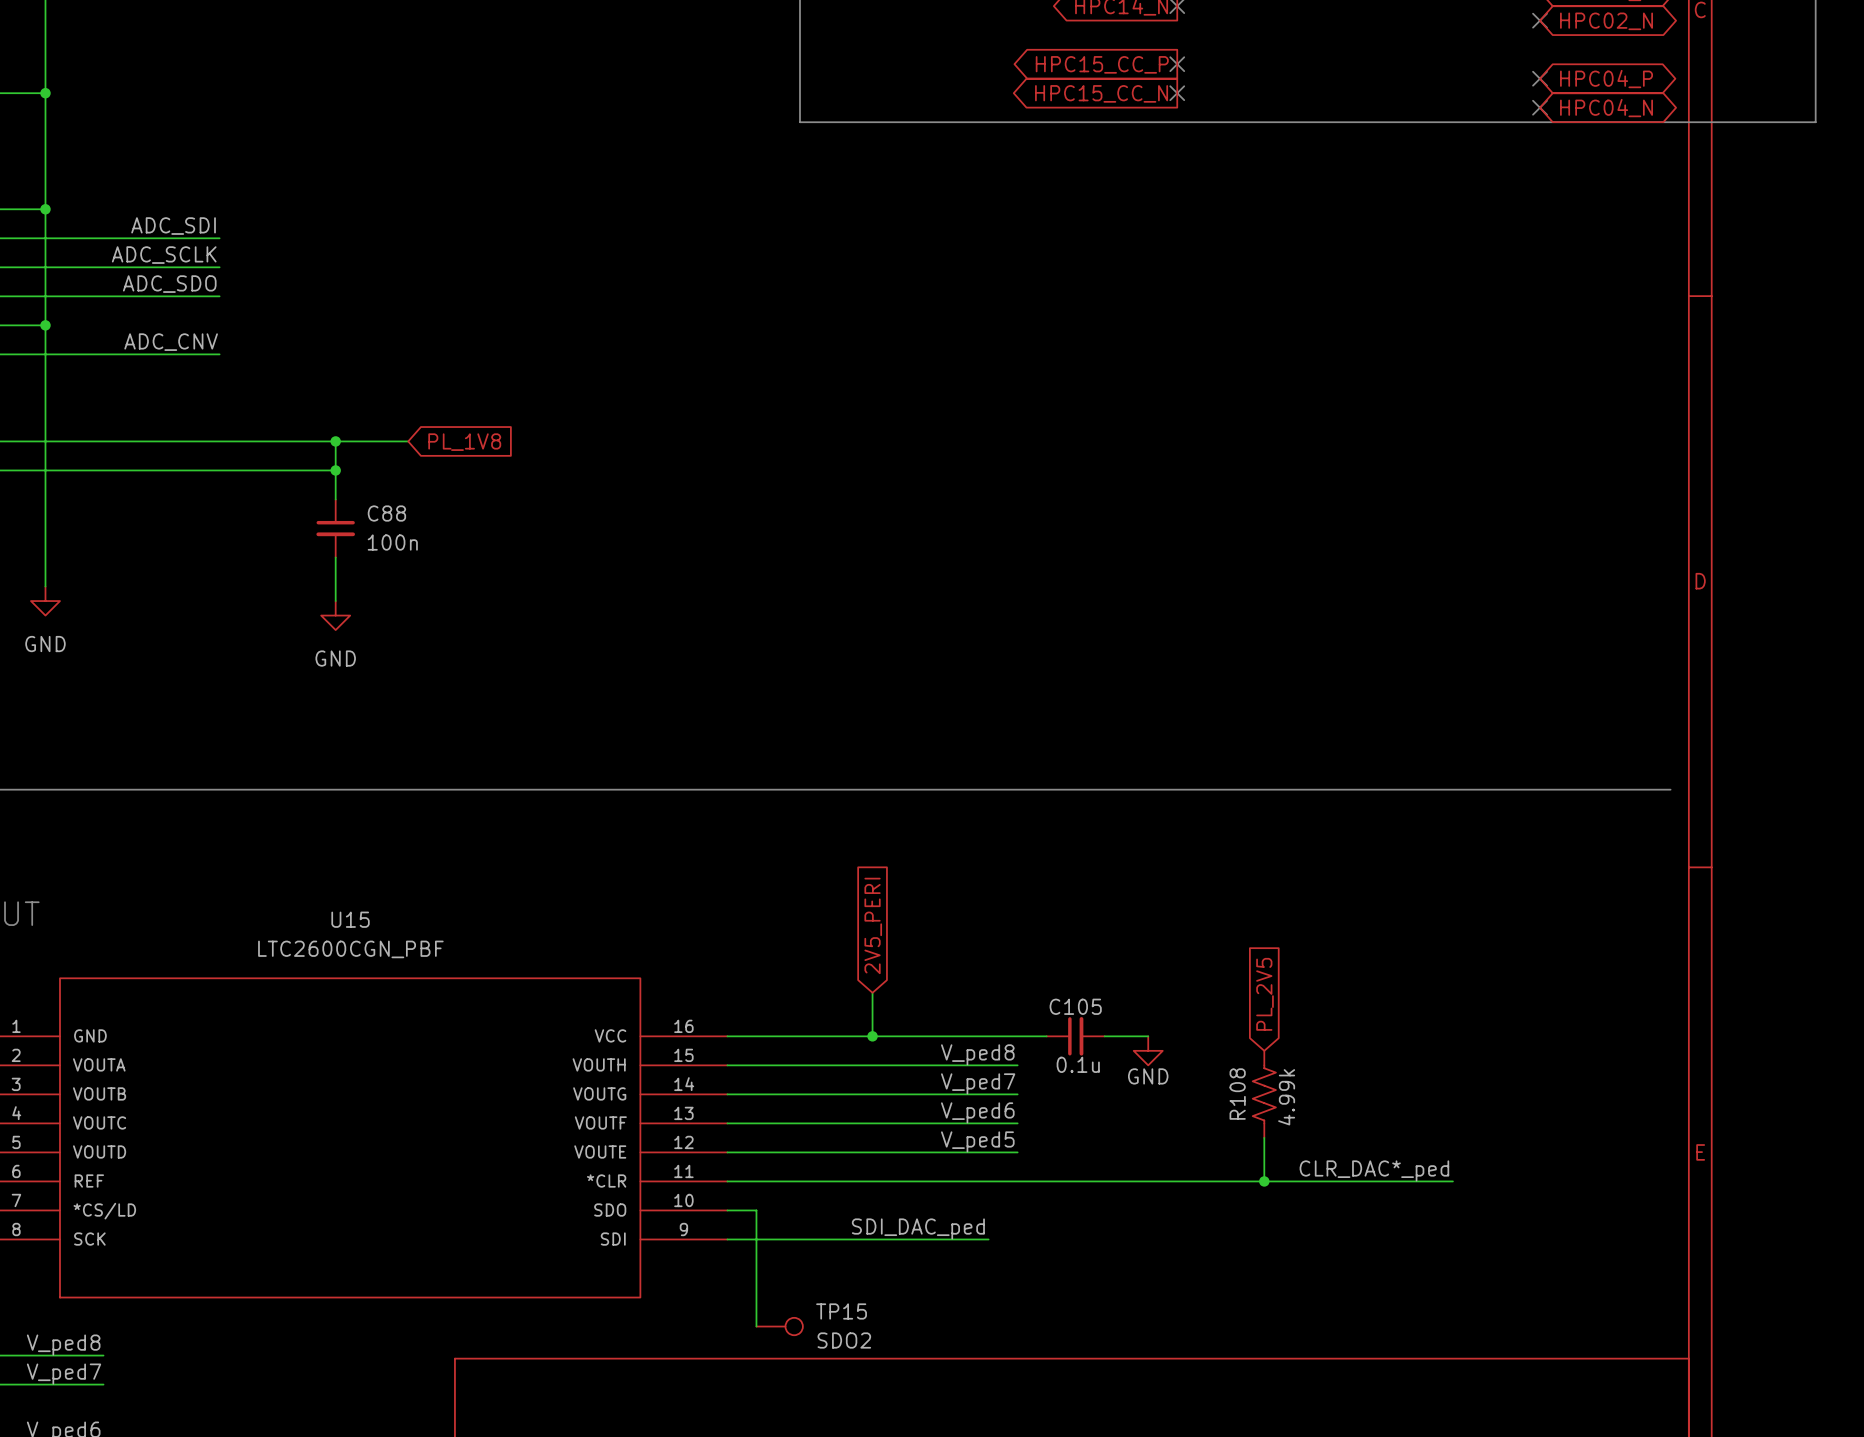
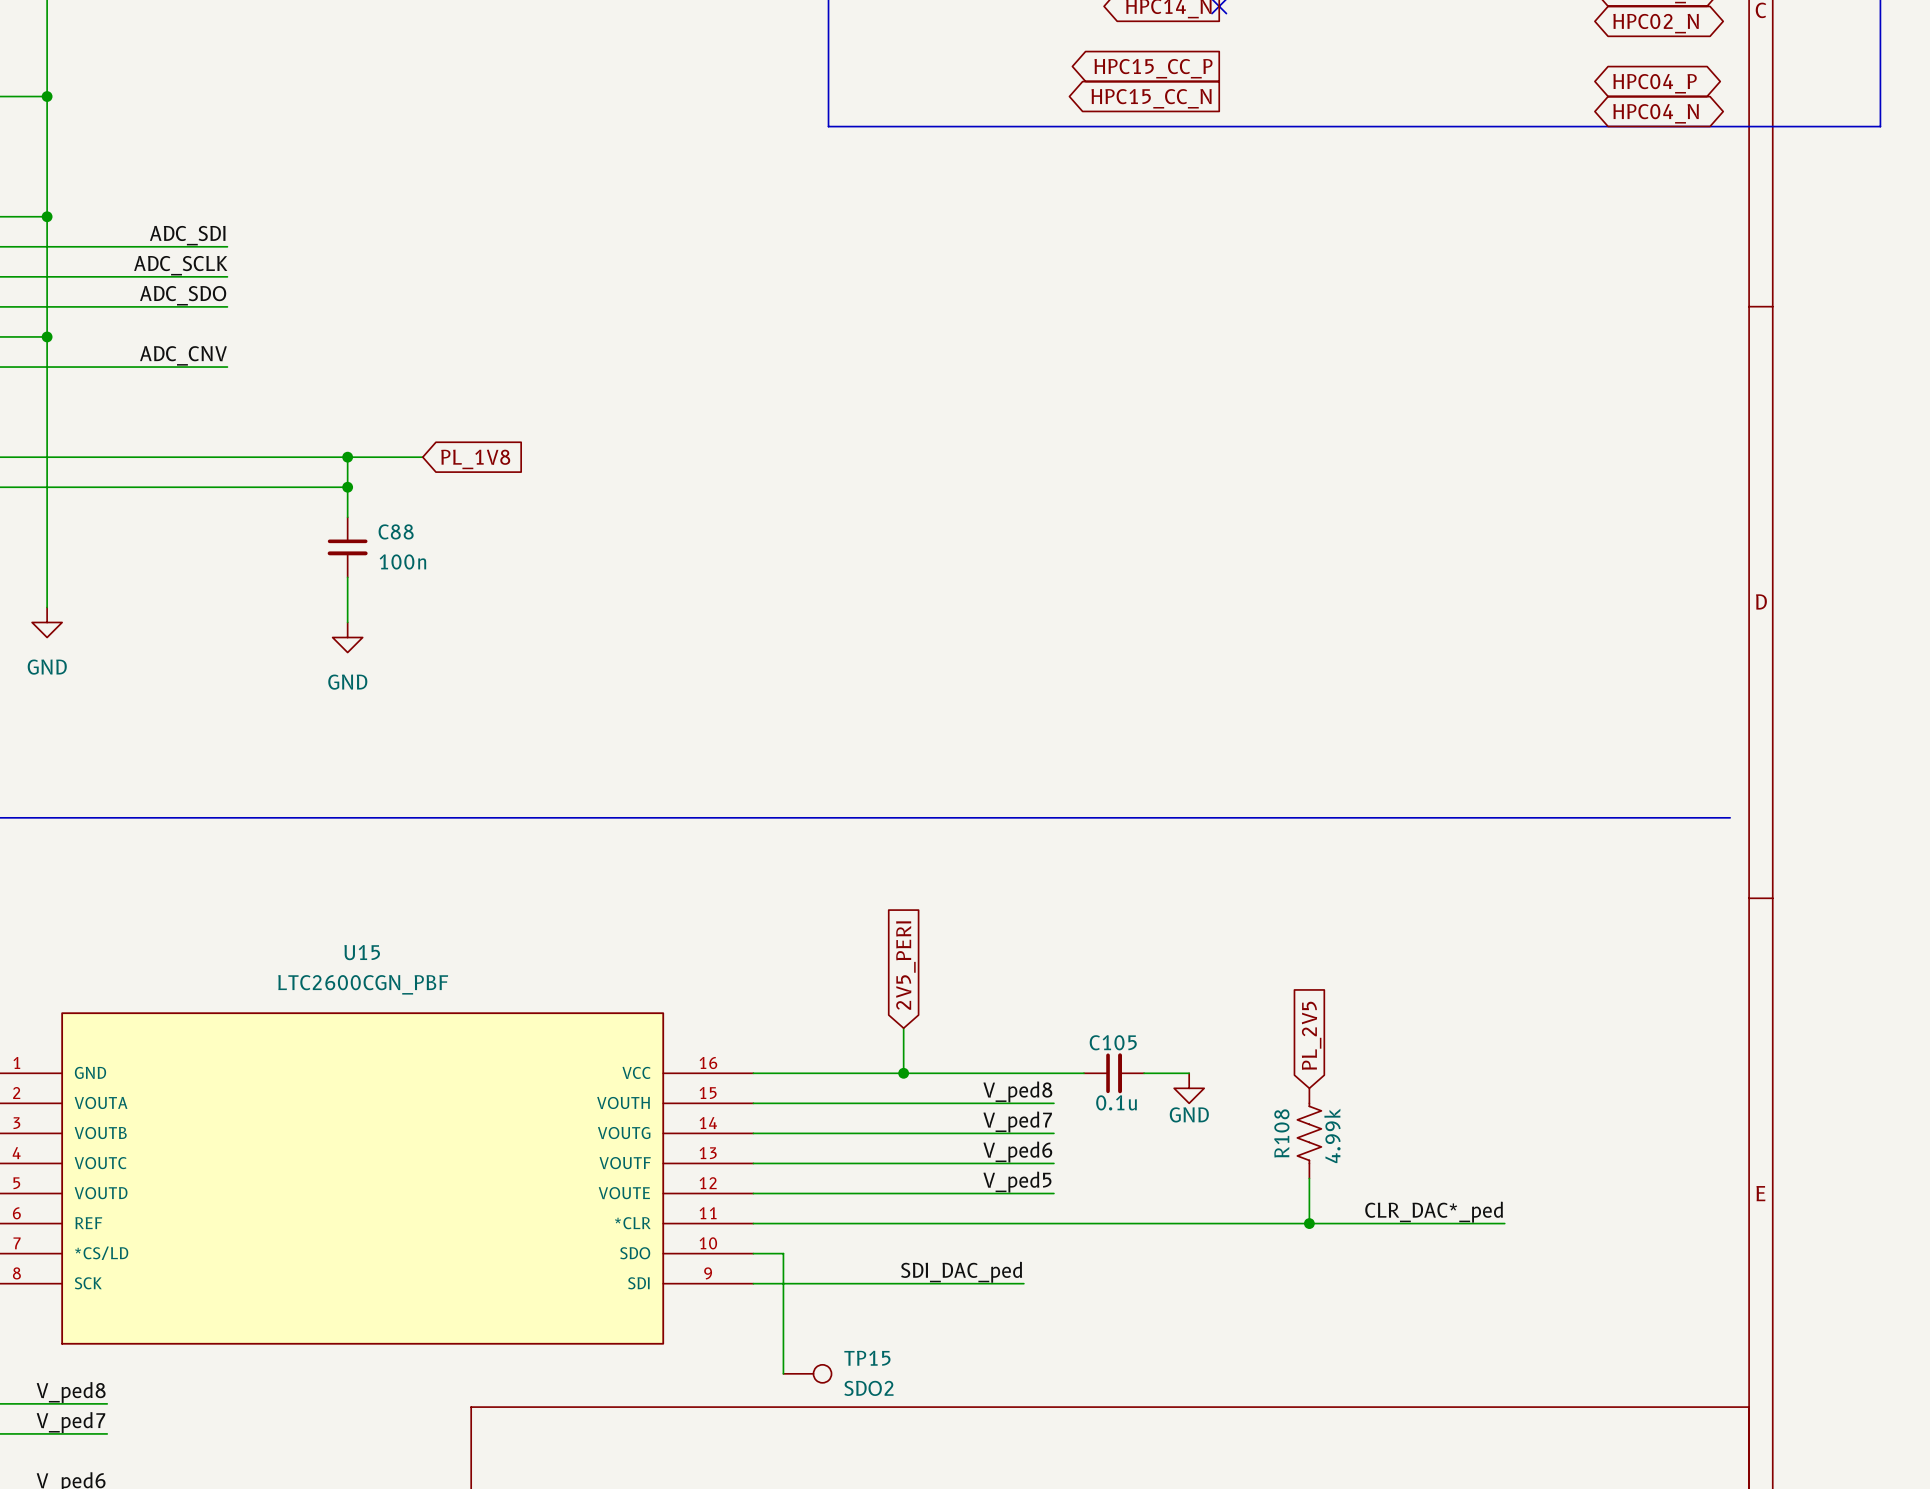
no-connect mark: (1539, 20) -> none
no-connect mark: (1177, 64) -> none
no-connect mark: (1539, 78) -> none
no-connect mark: (1177, 93) -> none
no-connect mark: (1539, 107) -> none

